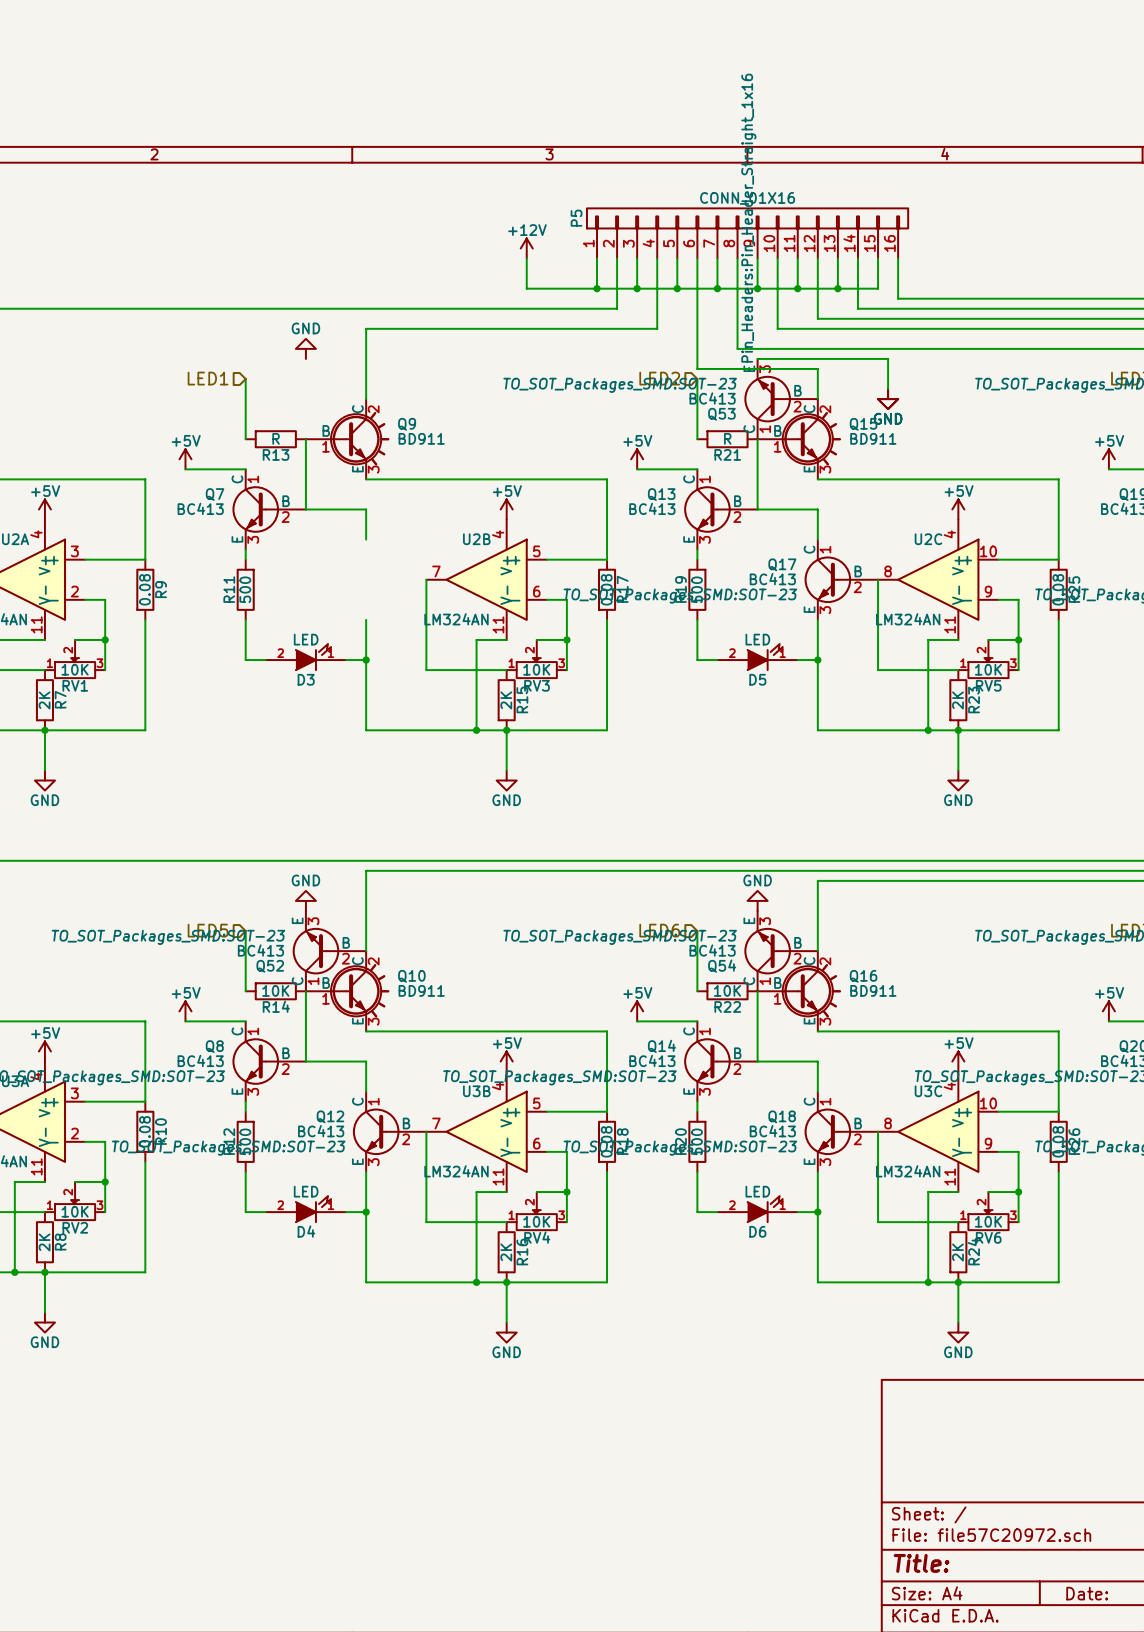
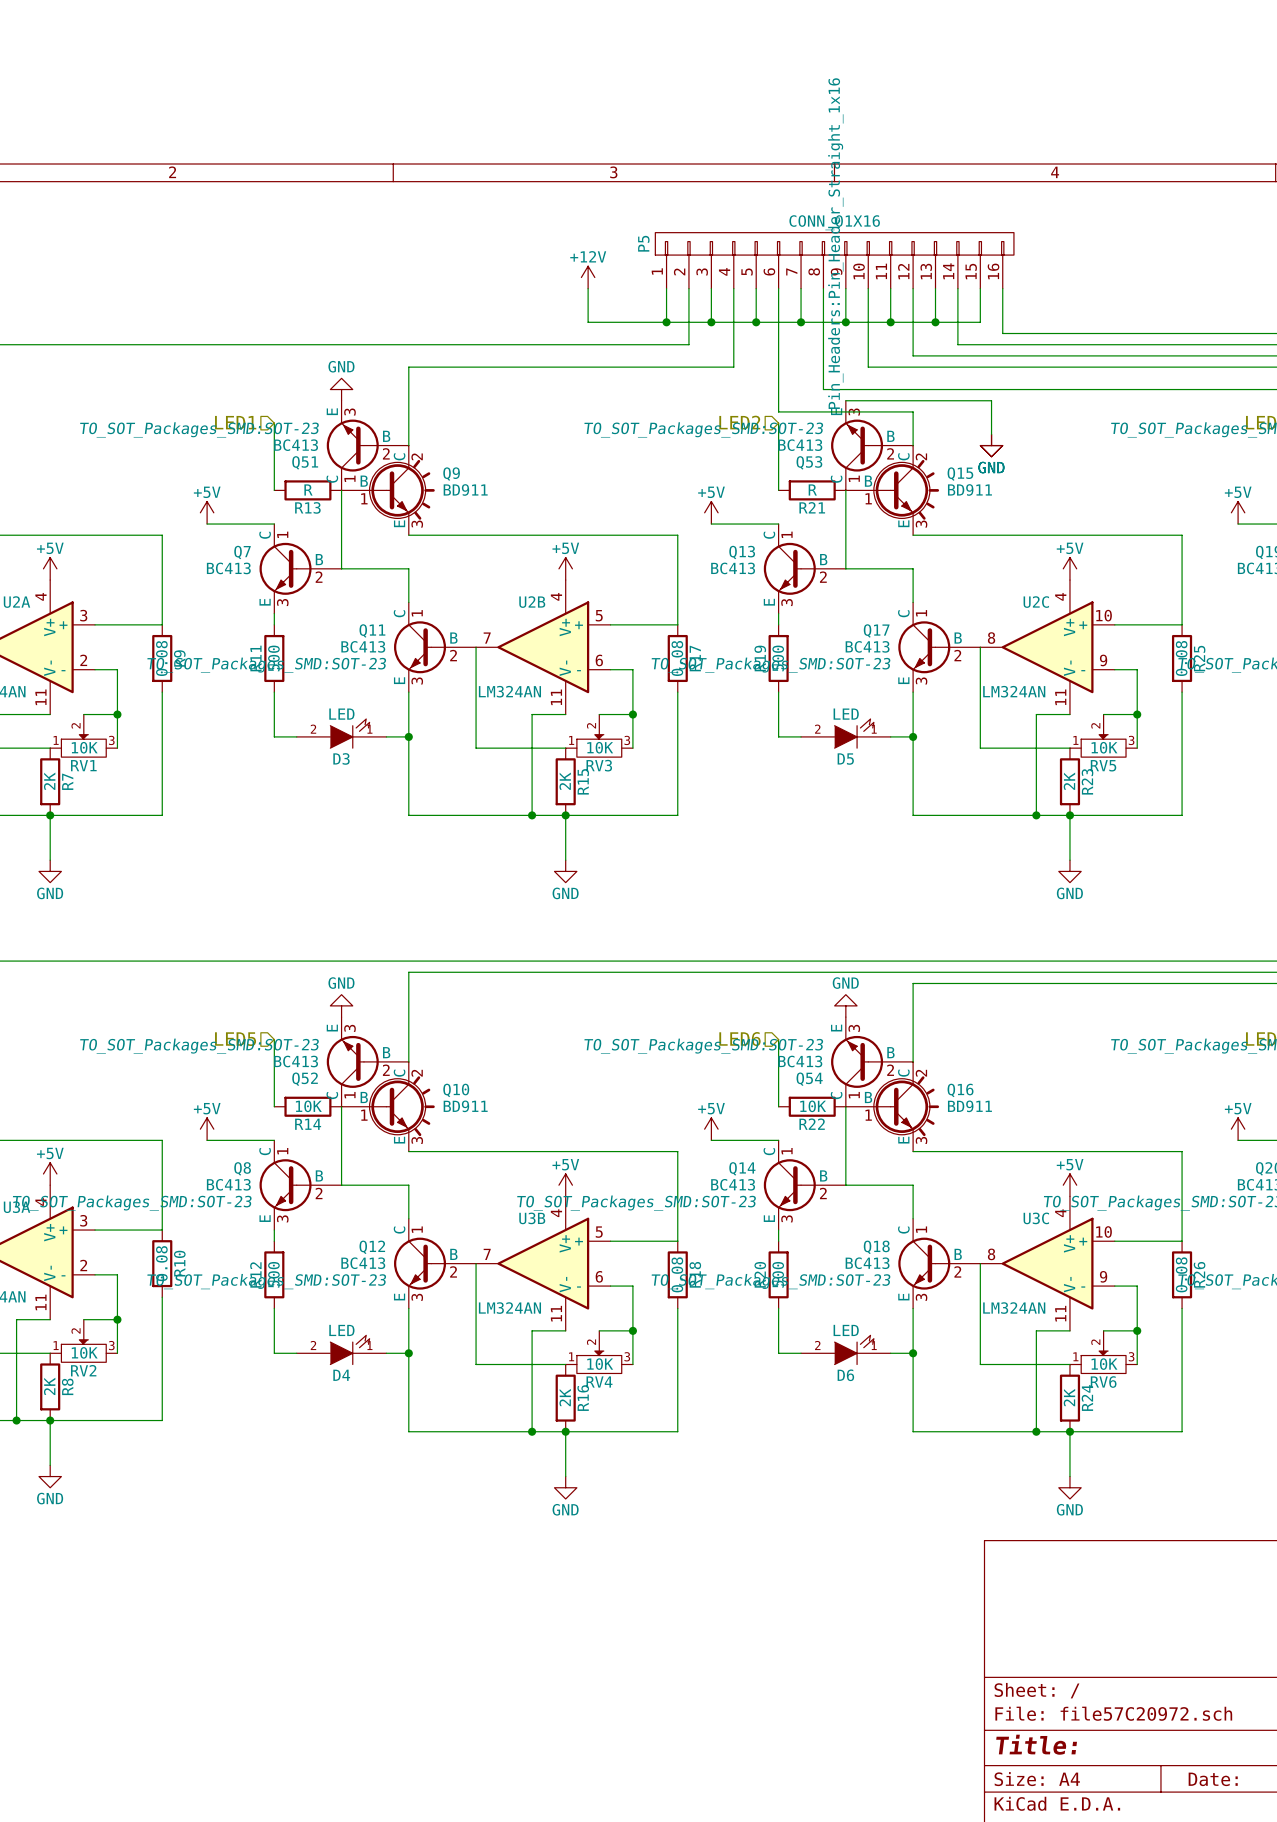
Q51: none -> BC413 (367, 445)
Q11: none -> BC413 (435, 647)

